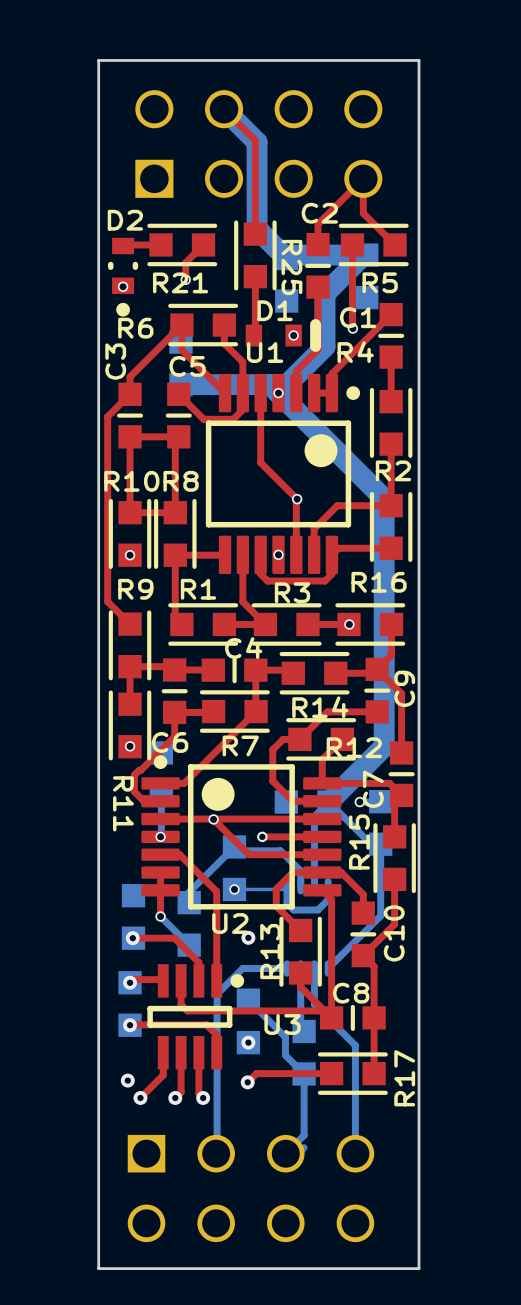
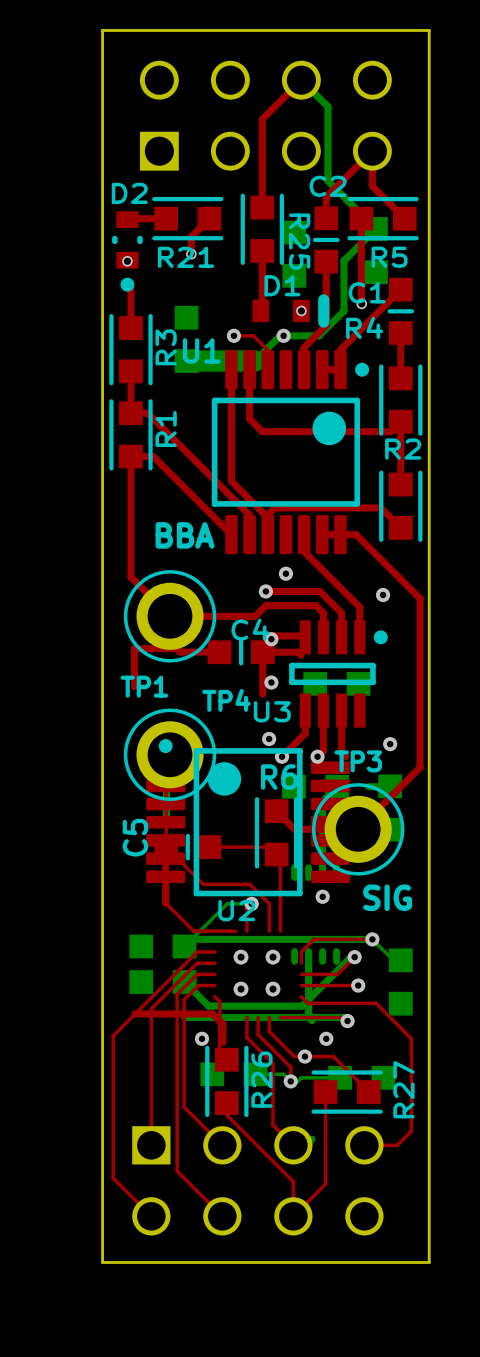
top track: (224, 109) (255, 140) (255, 147) -> (301, 80) (262, 119)
bottom track: (224, 109) (257, 142) (257, 228) (286, 258) (290, 255) (366, 255) -> none
bottom track: (363, 255) (325, 293) (325, 346) (278, 393) -> none
top track: none -> (130, 286) (130, 327)
R6 rotation: 0° (203, 325) -> 90° clockwise (276, 832)
R6 position: (203, 325) -> (276, 832)
top track: (224, 325) (224, 343) (242, 362) (242, 393) -> none
U1 name position: U1 (265, 352) -> U1 (201, 350)
via: none -> (233, 335)
via: none -> (283, 335)
C5 name position: C5 (187, 366) -> C5 (135, 837)
bottom track: (248, 384) (270, 384) (384, 498) (384, 746) (328, 802) (370, 844) (380, 844) (380, 915) (328, 968) -> (254, 361) (280, 335) (319, 335) (344, 310) (344, 260) (375, 228) (327, 180) (327, 106) (301, 80)
top track: (225, 393) (181, 349) (181, 325) (130, 376) (130, 394) (107, 416) (107, 601) (130, 624) -> (231, 369) (231, 481) (267, 517)
top track: (260, 393) (260, 462) (297, 499) (296, 554) -> (267, 369) (267, 350) (253, 335) (233, 335)
via: (278, 393) -> none
top track: none -> (130, 371) (130, 413) (147, 413) (249, 515) (249, 534)
top track: (178, 394) (203, 419) (233, 419) (242, 409) -> (400, 421) (390, 431) (262, 431) (249, 418) (249, 386)
C3: (130, 415) -> none
C5 rotation: 0° (178, 415) -> 90° clockwise (187, 847)
C5 position: (178, 415) -> (187, 847)
top track: (178, 436) (175, 443) (175, 512) (130, 512) (130, 436) (178, 436) -> none
via: (297, 499) -> none
top track: (391, 505) (337, 505) (314, 528) (314, 554) -> (276, 811) (294, 829) (358, 829) (420, 767) (420, 598) (356, 534) (322, 534)
R10: (130, 533) -> none
R8: (175, 533) -> none
top track: (391, 548) (338, 548) (331, 554) (331, 574) (324, 581) (267, 581) (260, 574) (260, 554) -> (400, 527) (380, 507) (274, 507) (267, 515) (267, 534)
top track: (242, 554) (242, 601) (265, 624) -> (323, 637) (323, 613) (315, 605) (272, 605)
via: (278, 554) -> none
top track: none -> (304, 534) (304, 551) (359, 607) (359, 637)
via: (130, 555) -> none
text: none -> BBA (185, 535)
top track: (224, 555) (175, 555) (175, 617) (181, 624) -> none
via: none -> (285, 573)
top track: none -> (265, 591) (319, 591) (341, 613) (341, 637)
via: none -> (265, 591)
via: none -> (383, 595)
R1 rotation: 0° (203, 624) -> 90° clockwise (130, 434)
R1 position: (203, 624) -> (130, 434)
top track: (224, 624) (258, 624) -> (231, 534) (153, 456) (130, 456) (130, 577) (170, 616) (255, 616) (265, 605)
R3 rotation: 0° (286, 624) -> 90° clockwise (130, 349)
R3 position: (286, 624) -> (130, 349)
top track: (307, 624) (349, 624) -> none
via: (349, 624) -> none
R16: (370, 624) -> none
top track: (391, 624) (391, 655) (373, 673) (335, 673) -> none
TP1: none -> (170, 616)
R9: (130, 645) -> none
via: none -> (271, 639)
top track: (377, 669) (401, 693) (401, 752) -> none
R14: (314, 673) -> none
C9: (377, 690) -> none
C6: (174, 691) -> none
via: none -> (271, 682)
part: none -> (336, 683)
top track: (213, 711) (174, 712) (174, 736) (134, 775) (134, 791) (143, 801) (160, 801) -> none
R7: (234, 711) -> none
top track: (256, 711) (184, 783) (160, 783) -> none
top track: (377, 711) (327, 711) (299, 739) (283, 739) (272, 749) (272, 781) (292, 801) (322, 801) -> none
R11: (130, 725) -> none
R12: (321, 739) -> none
top track: (342, 739) (322, 759) (322, 783) (389, 783) (401, 795) (394, 802) (394, 836) -> none
via: (130, 746) -> none
via: none -> (269, 738)
via: none -> (390, 744)
top track: none -> (170, 754) (166, 758) (166, 903) (193, 931) (235, 931)
TP4: none -> (170, 754)
via: none -> (282, 756)
via: none -> (317, 756)
C7: (401, 774) -> none
via: (359, 802) -> none
top track: (160, 819) (213, 819) (248, 854) (322, 854) -> none
via: (213, 819) -> none
top track: (322, 819) (213, 819) -> none
via: (160, 836) -> none
top track: (262, 836) (322, 836) -> none
via: (262, 836) -> none
TP3: none -> (358, 829)
top track: (160, 854) (179, 854) (216, 891) (216, 980) -> none
R15: (394, 858) -> none
top track: none -> (166, 847) (203, 884) (249, 884) (269, 903) (269, 931)
top track: none -> (209, 847) (269, 847) (280, 858) (280, 931)
part: (234, 868) -> none
top track: (394, 879) (394, 924) (363, 955) (374, 966) (374, 1073) -> none
bottom track: (286, 881) (287, 903) (293, 909) (318, 909) (328, 899) (328, 886) -> none
bottom track: (287, 886) (283, 889) (234, 889) -> none
bottom track: (300, 886) (300, 871) (280, 850) (238, 850) (234, 846) (189, 892) (189, 902) -> none
via: (234, 889) -> none
top track: (322, 890) (331, 899) (331, 1017) (300, 986) (300, 973) -> none
via: none -> (322, 896)
text: none -> SIG (387, 897)
top track: (363, 913) (363, 894) (341, 872) (292, 872) (276, 889) (276, 906) (300, 930) -> none
part: (133, 916) -> none
bottom track: (160, 916) (189, 945) -> none
via: (160, 916) -> none
top track: none -> (251, 903) (246, 908) (246, 931)
bottom track: none -> (251, 903) (227, 903) (184, 946) (191, 939) (372, 939) (393, 960) (400, 960)
part: (189, 923) -> none
C10: (363, 934) -> none
via position: (248, 937) -> (251, 903)
top track: (132, 938) (174, 938) (198, 962) (198, 980) -> none
via: (132, 938) -> none
R13: (300, 951) -> none
top track: none -> (372, 939) (314, 939) (301, 952) (301, 963)
via: none -> (372, 939)
part: none -> (162, 946)
top track: none -> (214, 952) (197, 952) (113, 1035) (113, 1178) (151, 1216)
bottom track: (287, 968) (242, 968) (217, 994) (217, 1152) -> none
bottom track: (314, 968) (314, 1004) (355, 1045) (355, 1153) -> none
via: none -> (241, 957)
via: none -> (273, 957)
top track: none -> (354, 957) (337, 974) (301, 974)
bottom track: none -> (354, 957) (351, 957) (302, 1006) (208, 1006) (184, 982)
via: none -> (354, 957)
top track: none -> (214, 963) (197, 963) (151, 1008) (151, 1145)
top track: (163, 980) (133, 979) (130, 982) -> (305, 637) (274, 636) (271, 639)
top track: (181, 980) (181, 1004) (187, 1010) (324, 1010) -> none
via: (130, 982) -> none
top track: none -> (214, 974) (197, 974) (177, 994) (177, 1171) (222, 1216)
part: none -> (162, 982)
part: none -> (400, 982)
top track: none -> (214, 985) (198, 985) (184, 999) (184, 1107) (222, 1145)
top track: none -> (301, 985) (358, 985)
via: none -> (358, 985)
via: none -> (241, 989)
bottom track: (248, 1000) (285, 1037) (285, 1055) (304, 1073) -> none
via: none -> (273, 989)
part: (130, 1003) -> none
top track: none -> (214, 996) (219, 1001) (219, 1052) (226, 1059)
top track: none -> (301, 996) (307, 1003) (375, 1003) (411, 1038) (411, 1131) (397, 1145) (364, 1145)
U3 position: (195, 1016) -> (338, 673)
C8: (352, 1017) -> none
R27 side: bottom (248, 1021) -> top (347, 1092)
U3 name position: U3 (282, 1024) -> U3 (272, 711)
via: (130, 1025) -> none
bottom track: none -> (184, 1017) (344, 1017) (347, 1021)
top track: none -> (246, 1017) (246, 1037) (273, 1063) (273, 1124) (293, 1145)
top track: none -> (258, 1017) (258, 1034) (290, 1067) (290, 1081)
top track: none -> (269, 1017) (269, 1031) (294, 1056) (333, 1056) (368, 1092)
top track: none -> (280, 1017) (344, 1017) (347, 1021)
via: none -> (347, 1021)
via: (248, 1042) -> none
via: none -> (201, 1038)
via: none -> (326, 1038)
top track: (163, 1052) (163, 1075) (140, 1097) -> (305, 710) (305, 733) (282, 756)
top track: (181, 1052) (181, 1092) (175, 1097) -> (323, 710) (323, 750) (317, 756)
top track: (198, 1052) (198, 1093) (203, 1097) -> (341, 710) (341, 752) (345, 756)
R26 side: bottom (304, 1052) -> top (226, 1081)
via: none -> (304, 1056)
bottom track: (304, 1073) (304, 1135) (285, 1153) -> none
top track: (331, 1073) (256, 1073) (247, 1082) -> none
R17: (352, 1073) -> none
via: (127, 1080) -> none
via: (247, 1082) -> none
part: none -> (233, 1074)
bottom track: none -> (255, 1074) (283, 1074) (290, 1081) (297, 1081) (301, 1077) (340, 1077)
part: none -> (361, 1077)
via: none -> (290, 1081)
via: (140, 1097) -> none
via: (175, 1097) -> none
via: (203, 1097) -> none
top track: none -> (325, 1092) (325, 1184) (293, 1216) (293, 1181) (226, 1115) (226, 1103)

